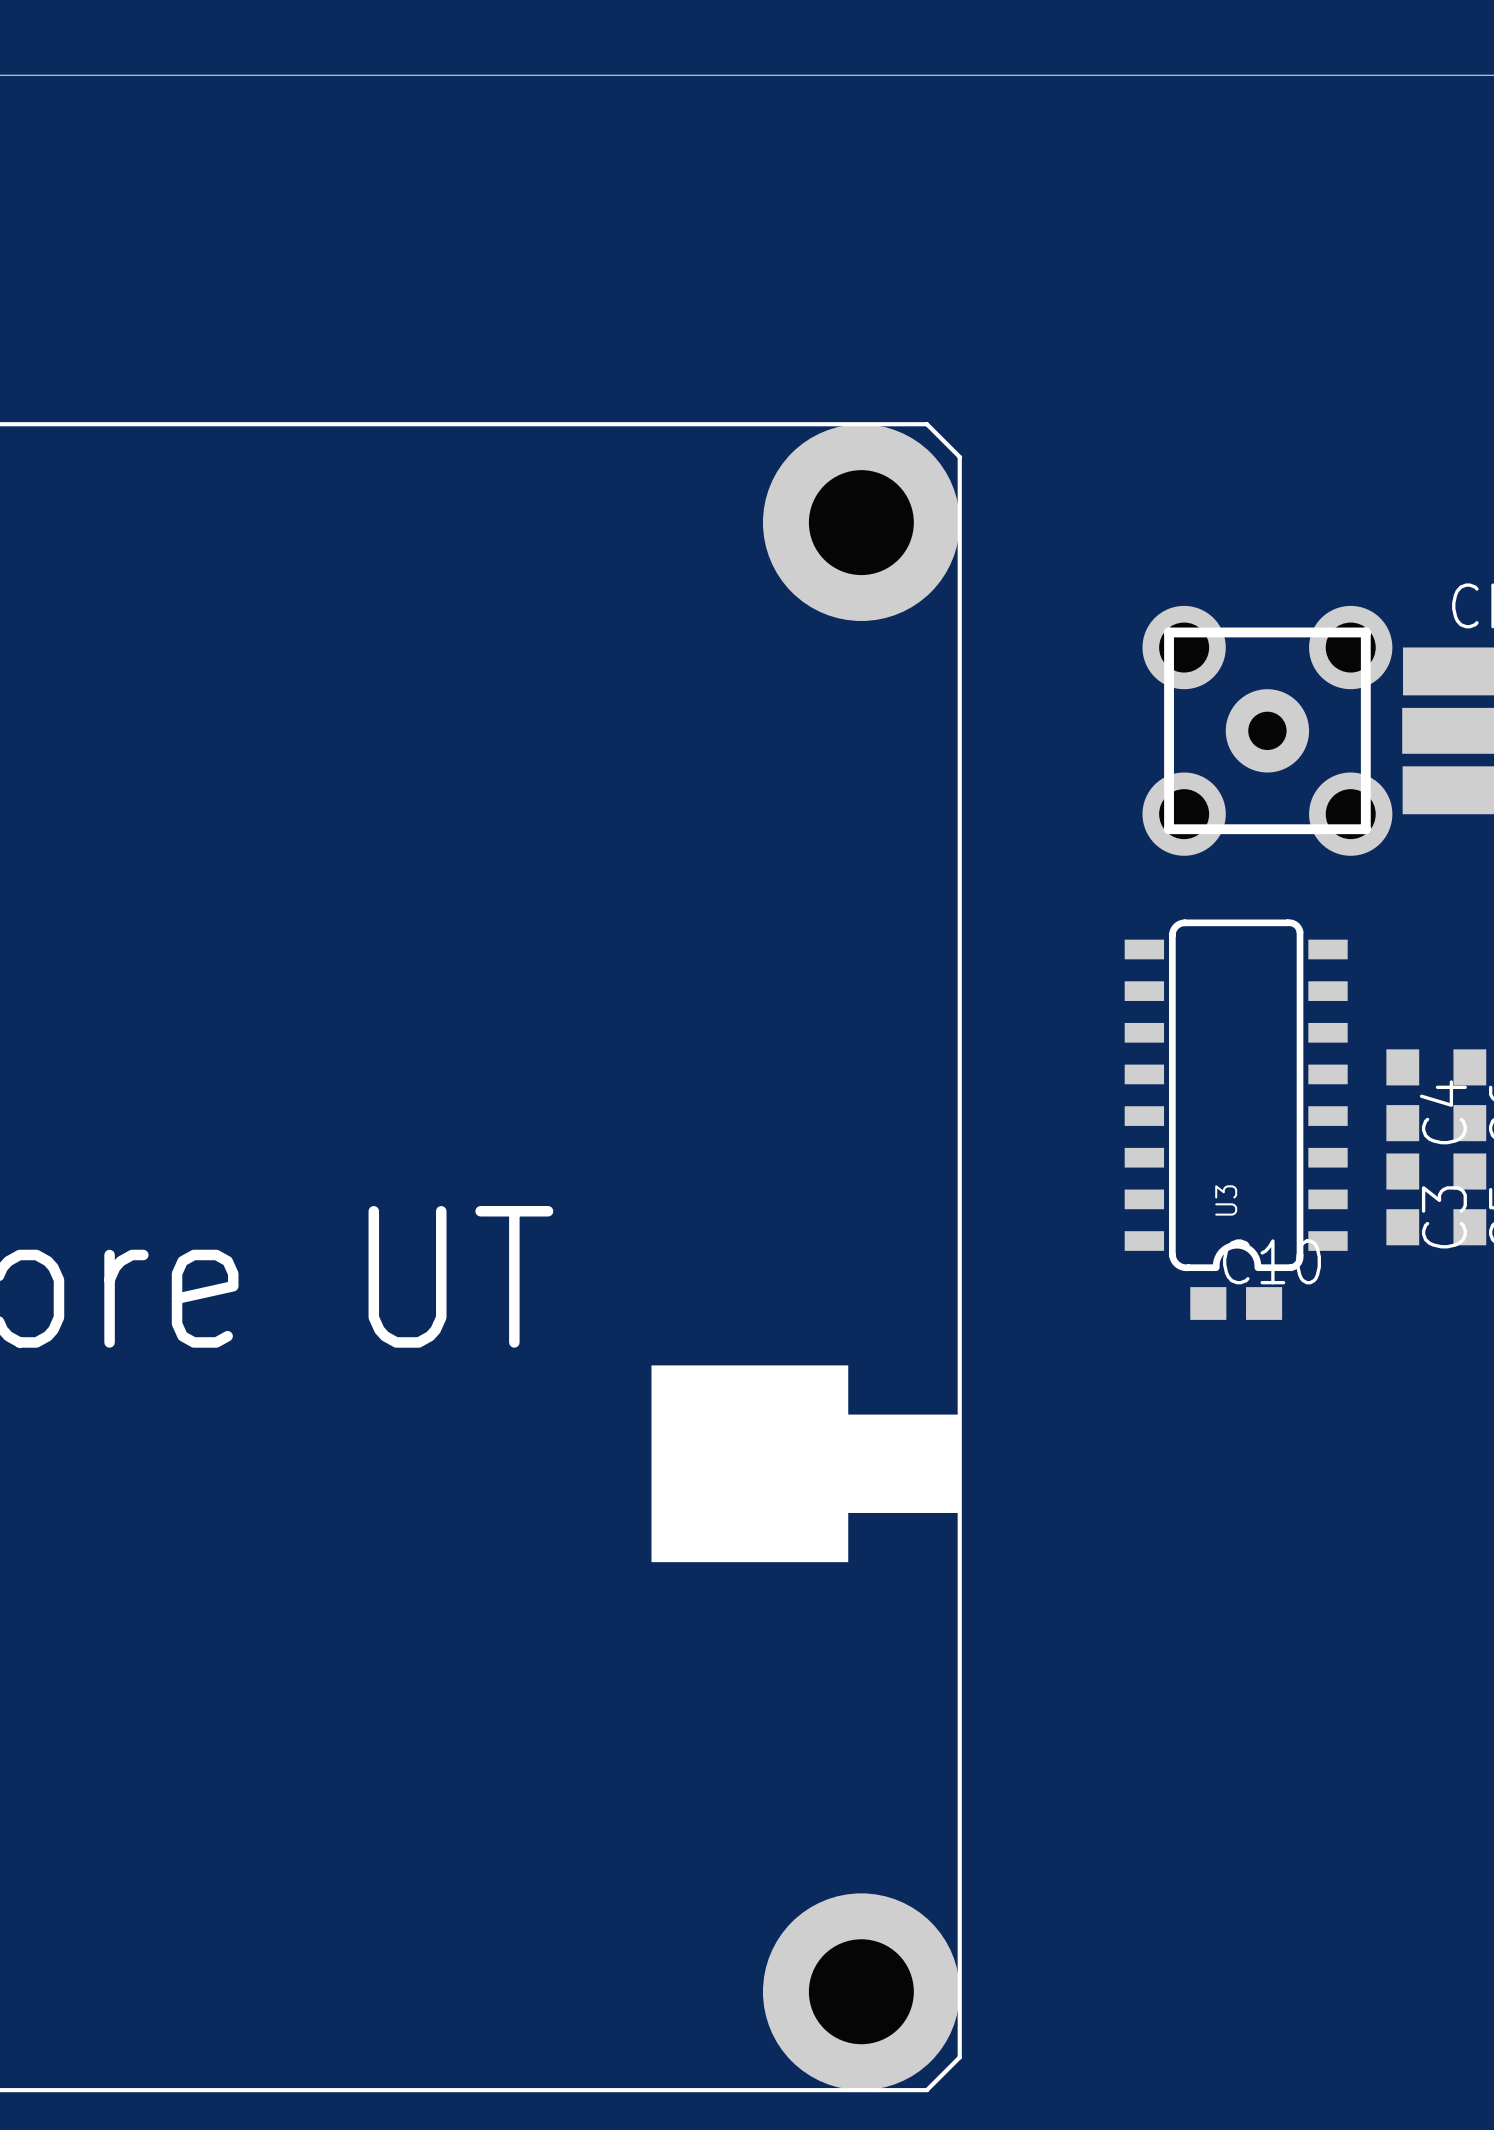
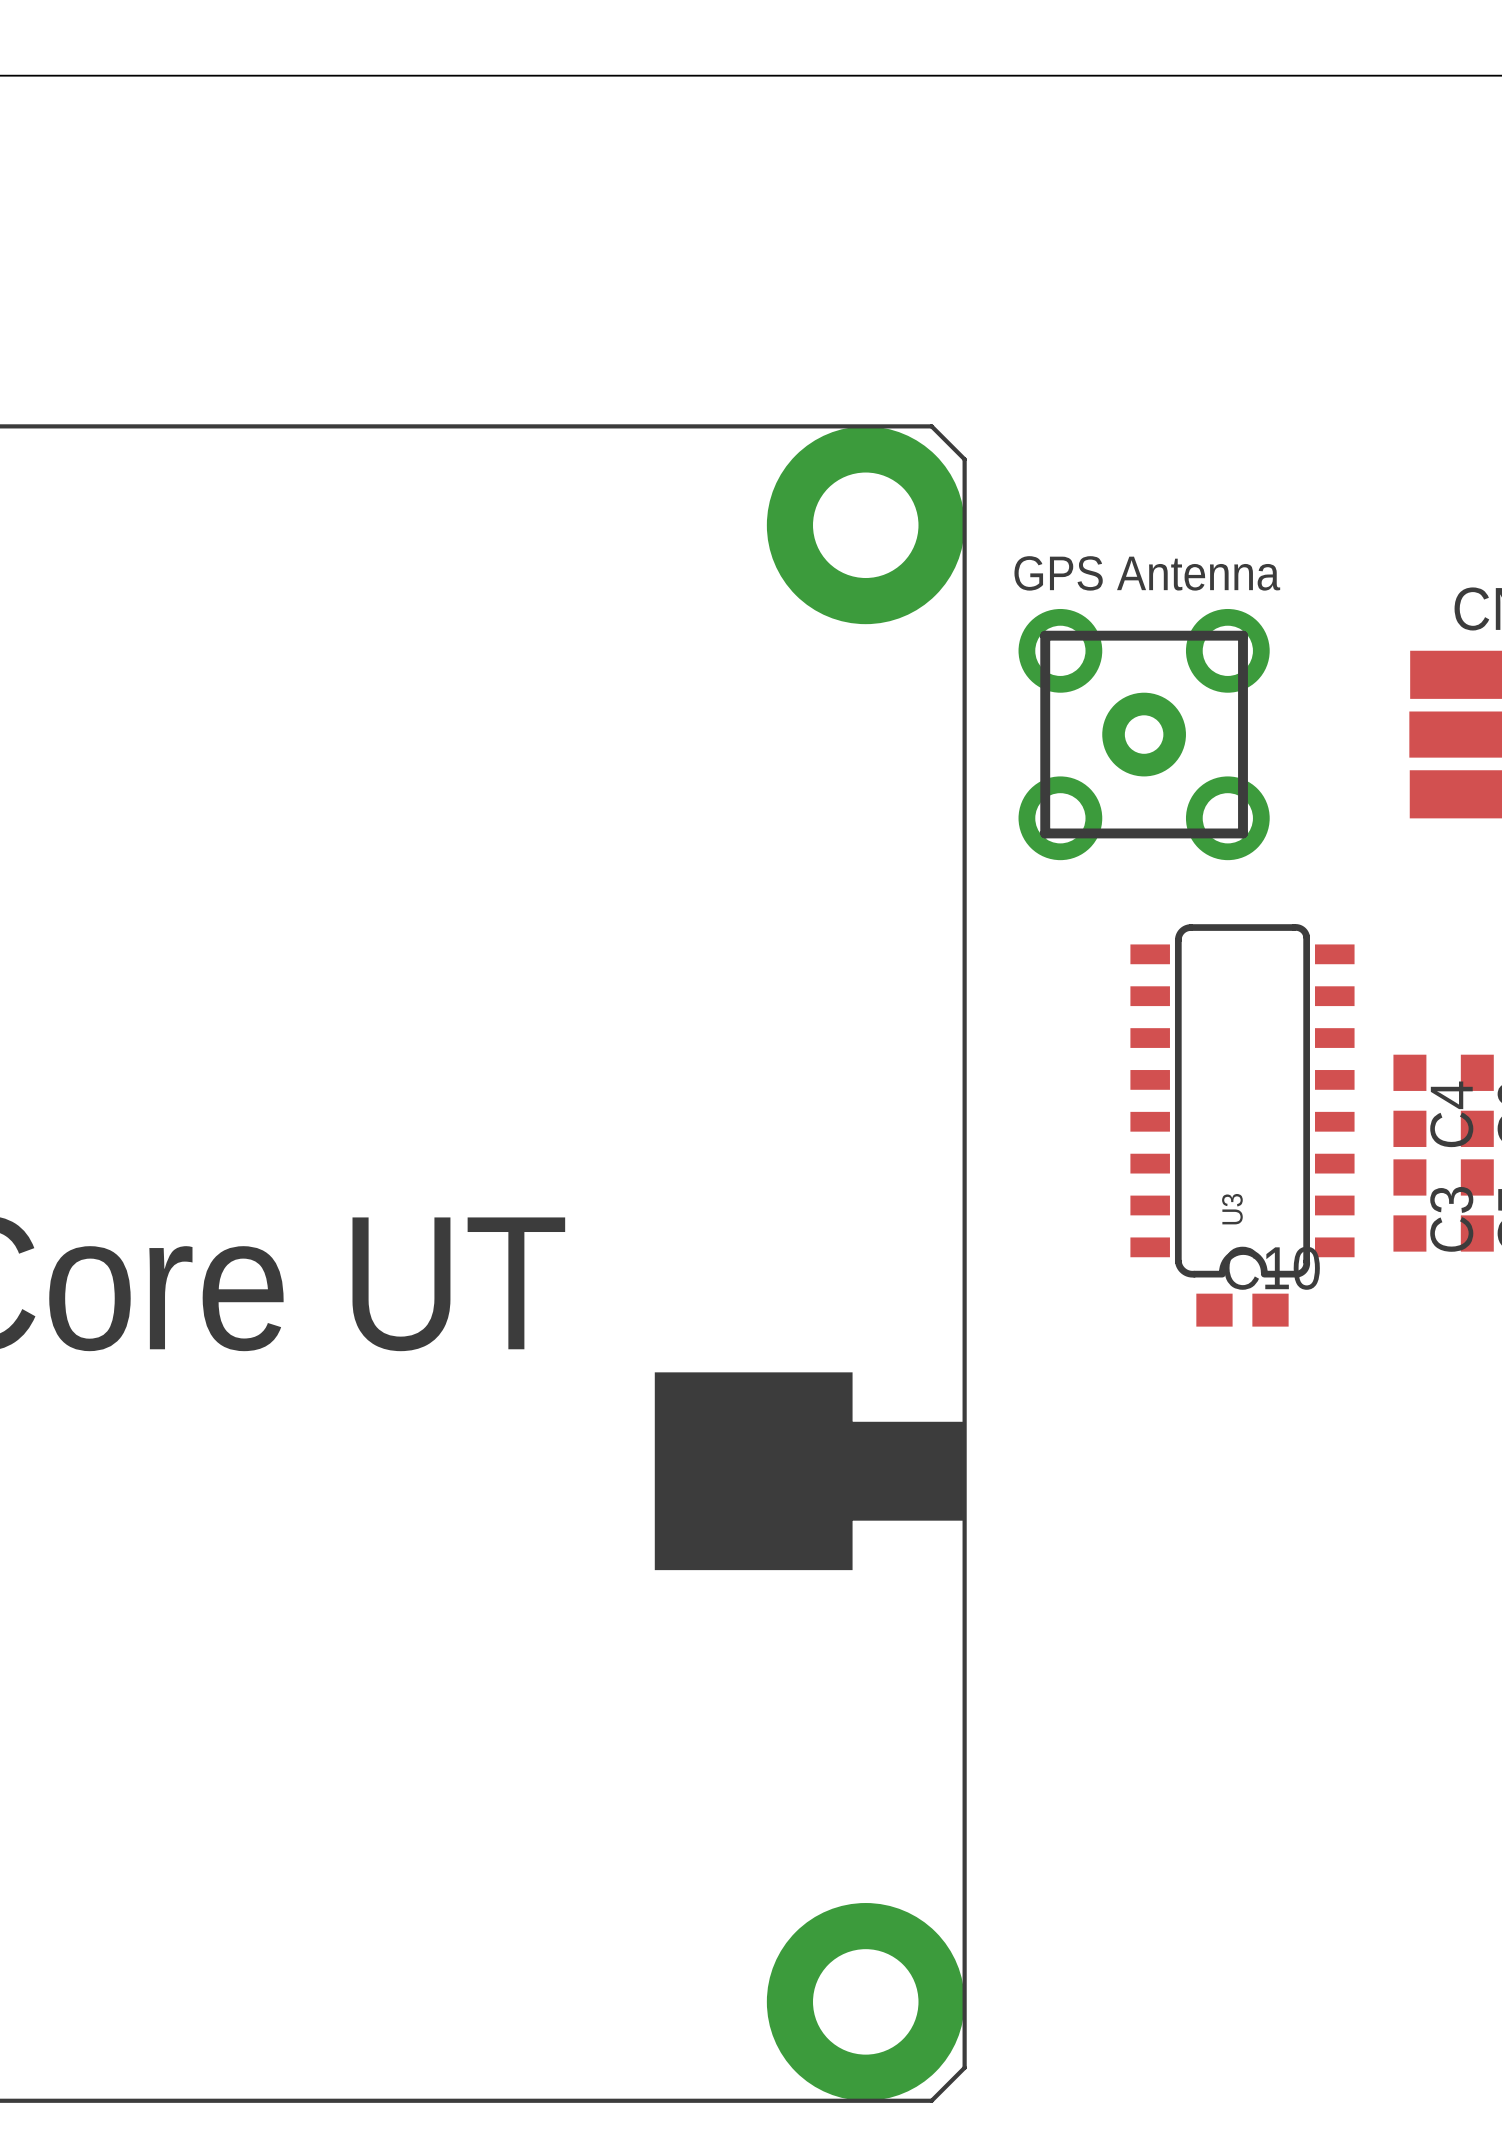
text: none -> GPS Antenna (1147, 573)
part position: (1267, 730) -> (1144, 734)

